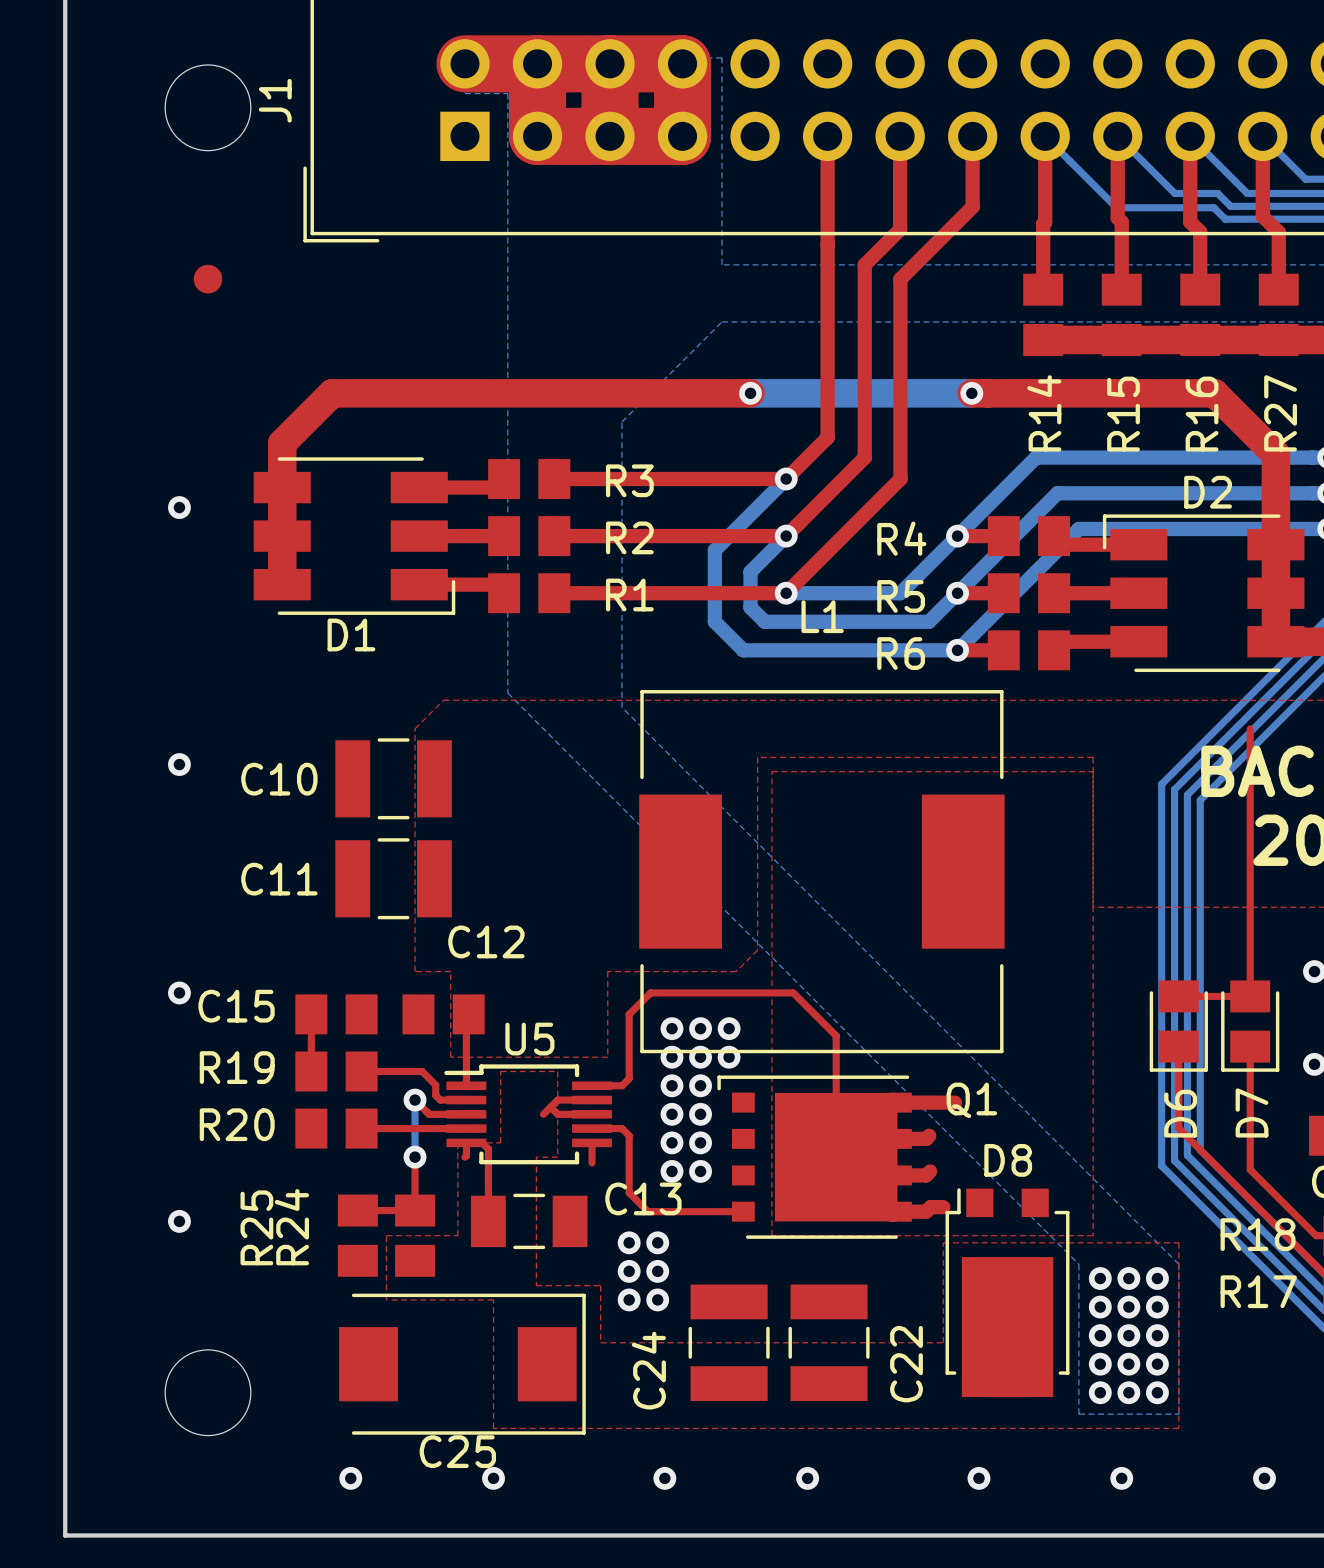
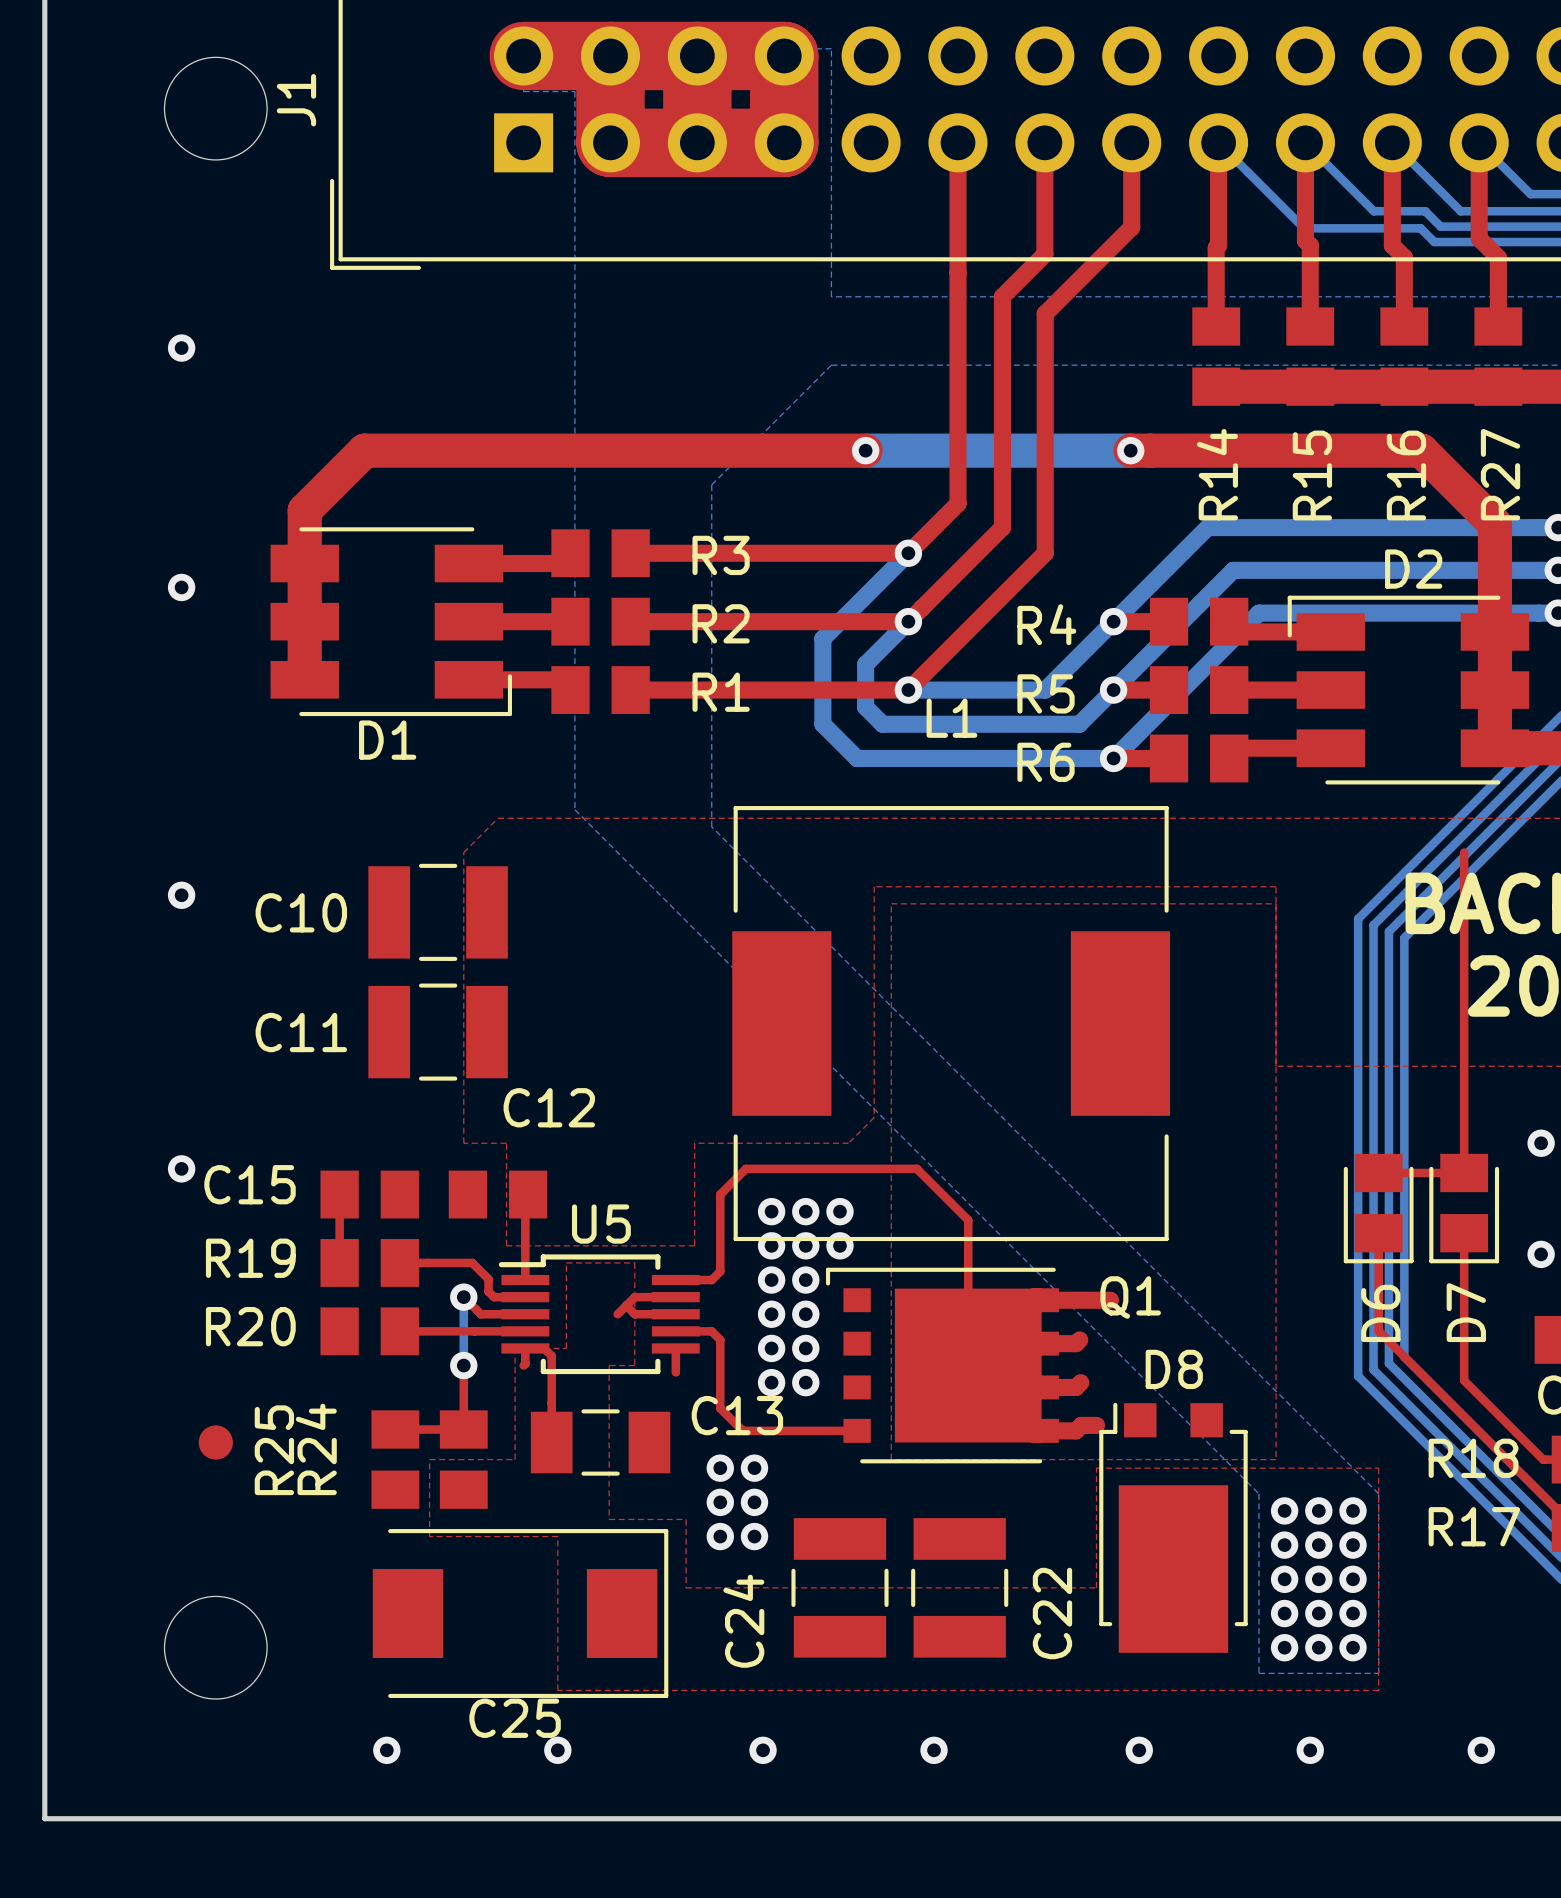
part: (208, 279) -> none
via: none -> (181, 348)
via: (179, 1221) -> none
part: none -> (215, 1442)

